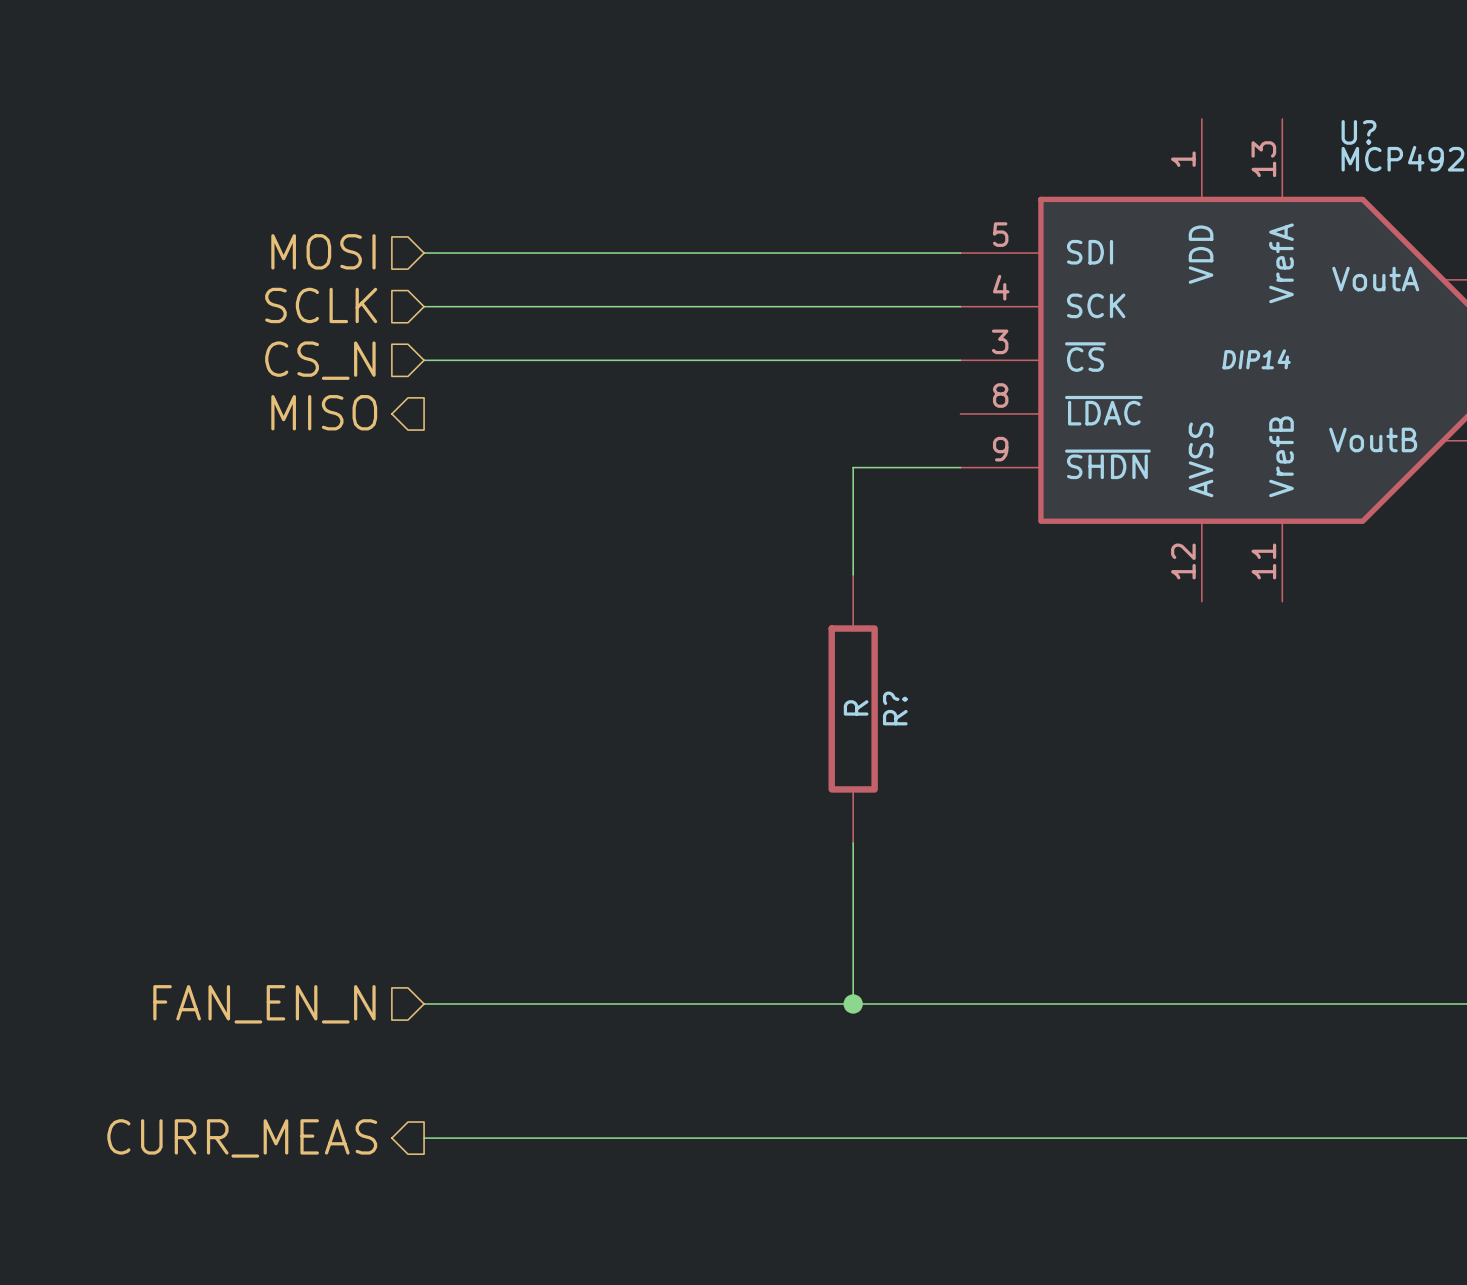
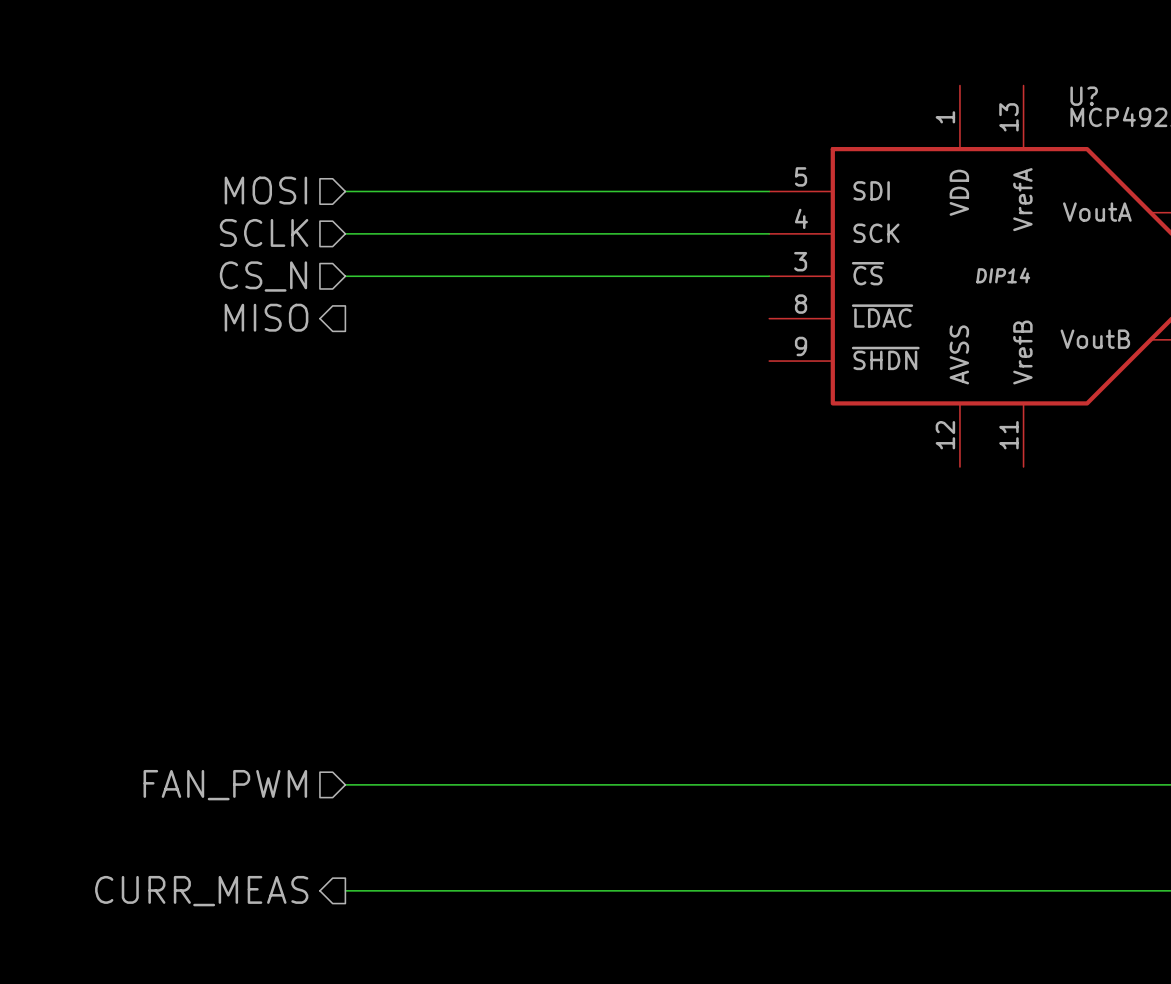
wire: (960, 467) (853, 467) (853, 574) -> none
R?: R (853, 708) -> none
wire: (853, 843) (853, 1004) -> none
hierarchical label: FAN_EN_N (264, 1004) -> FAN_PWM (225, 785)
junction: (853, 1004) -> none

